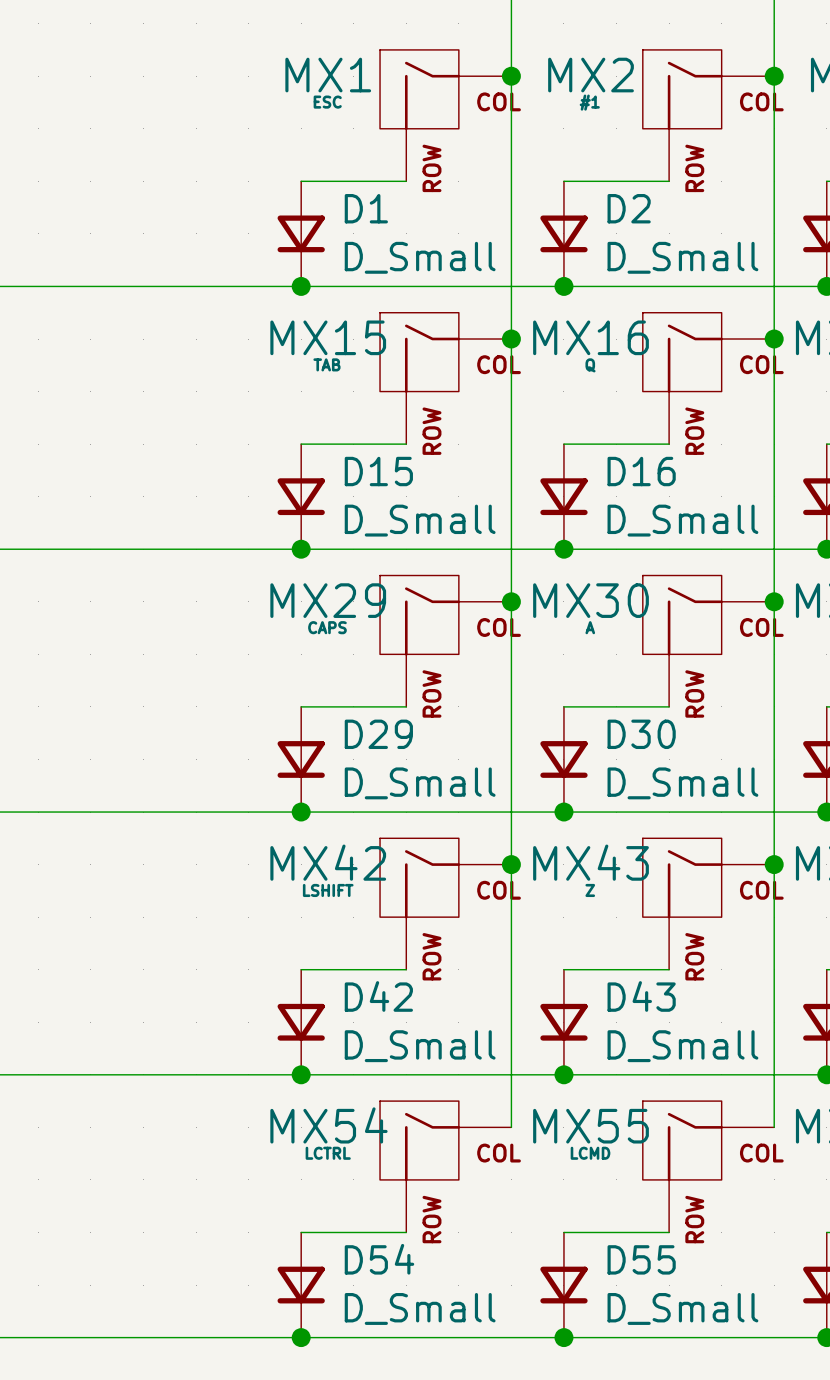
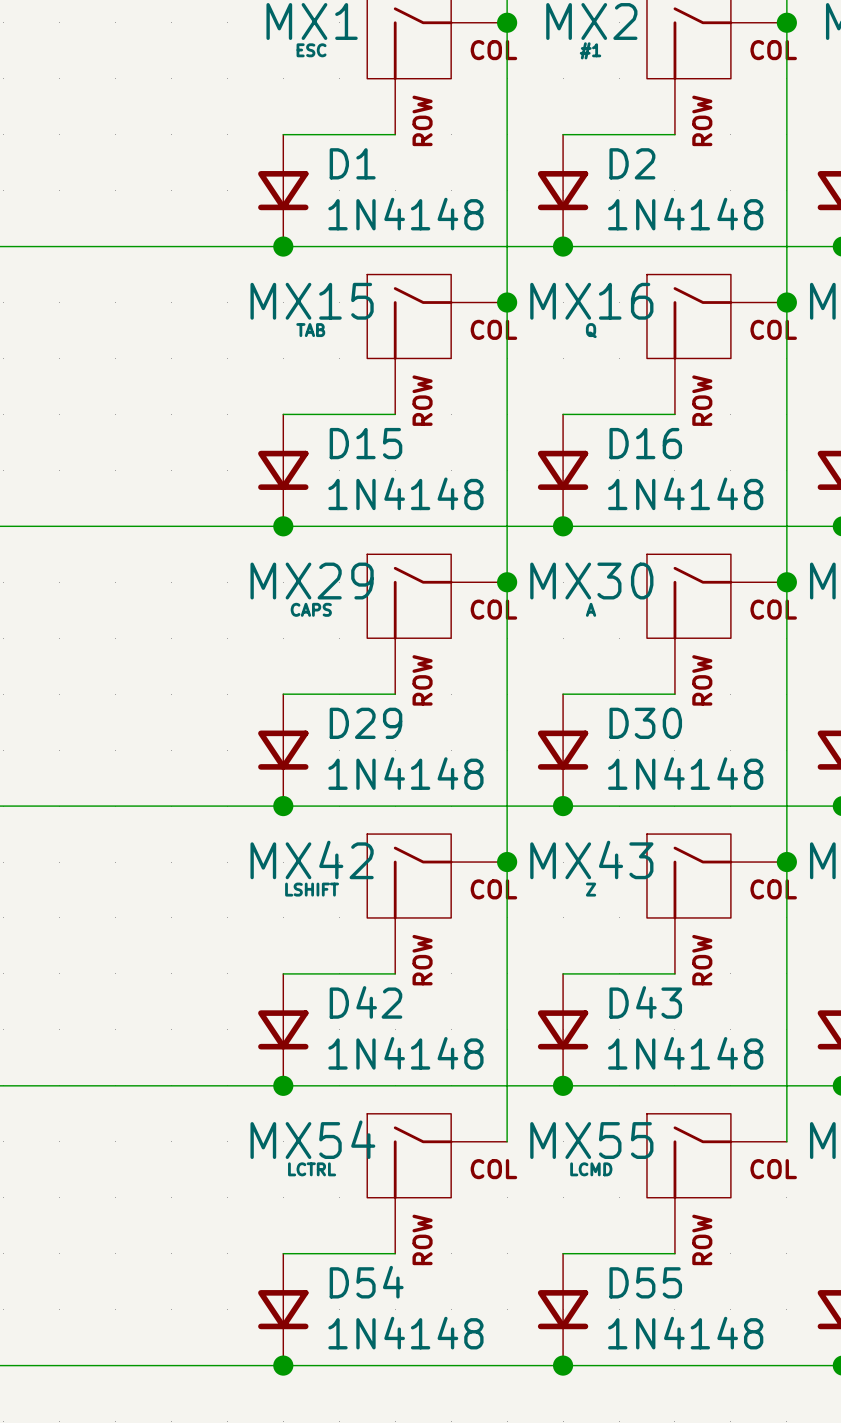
D1 value: D_Small (420, 257) -> 1N4148 (405, 214)
D2 value: D_Small (682, 257) -> 1N4148 (685, 214)
D15 value: D_Small (420, 520) -> 1N4148 (405, 493)
D16 value: D_Small (682, 520) -> 1N4148 (685, 493)
D29 value: D_Small (420, 783) -> 1N4148 (405, 773)
D30 value: D_Small (682, 783) -> 1N4148 (685, 773)
D42 value: D_Small (420, 1046) -> 1N4148 (405, 1053)
D43 value: D_Small (682, 1046) -> 1N4148 (685, 1053)
D54 value: D_Small (420, 1308) -> 1N4148 (405, 1333)
D55 value: D_Small (682, 1308) -> 1N4148 (685, 1333)

